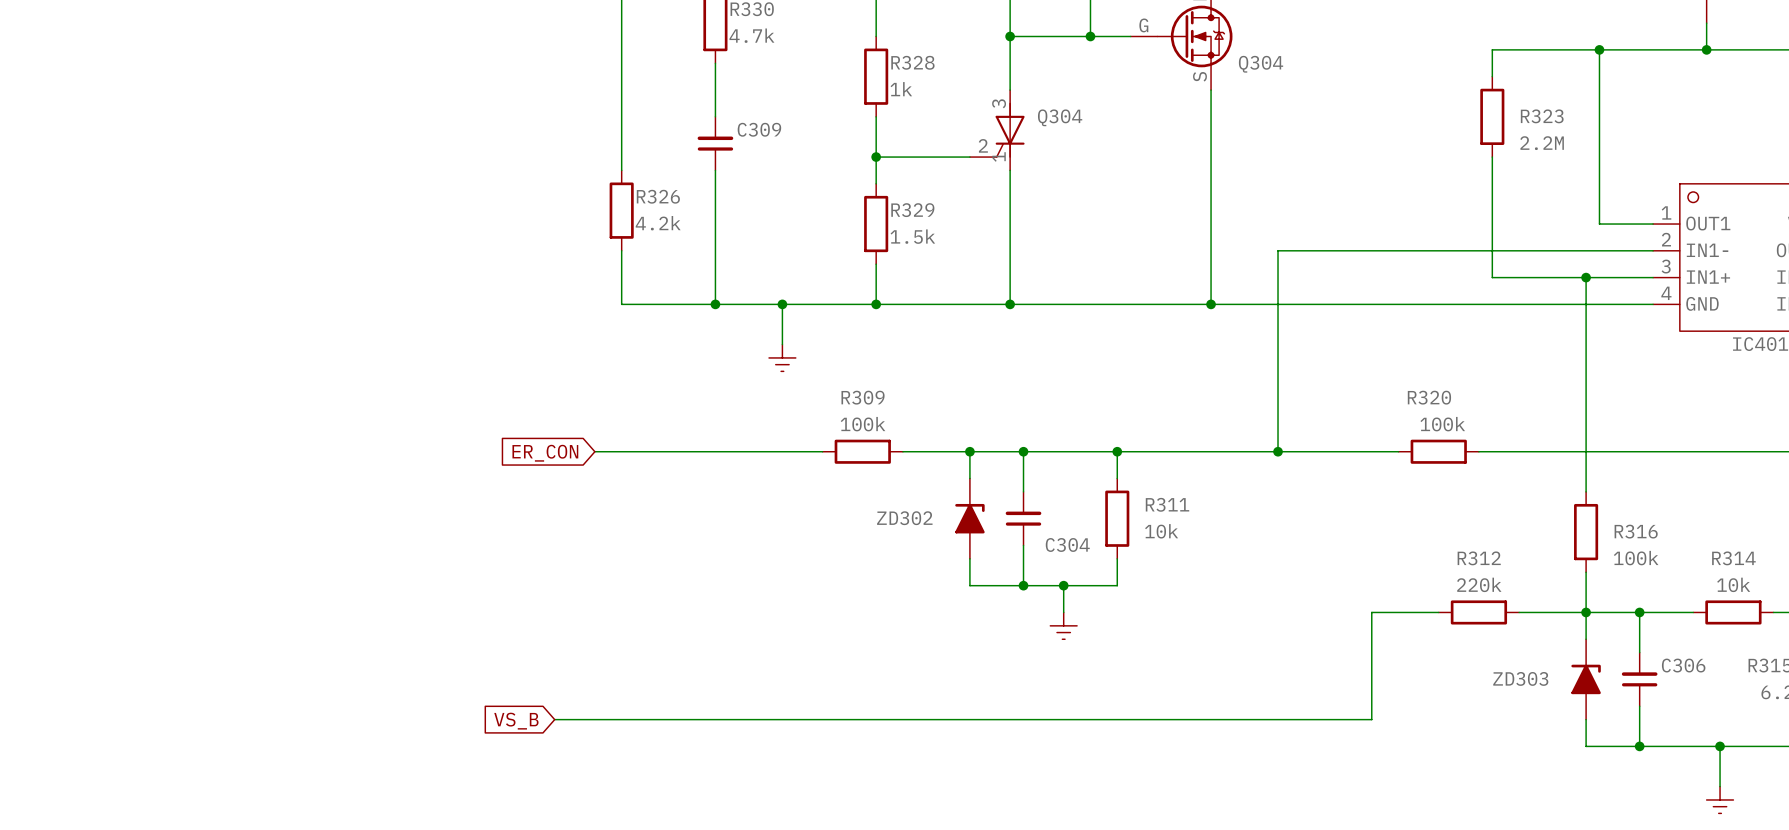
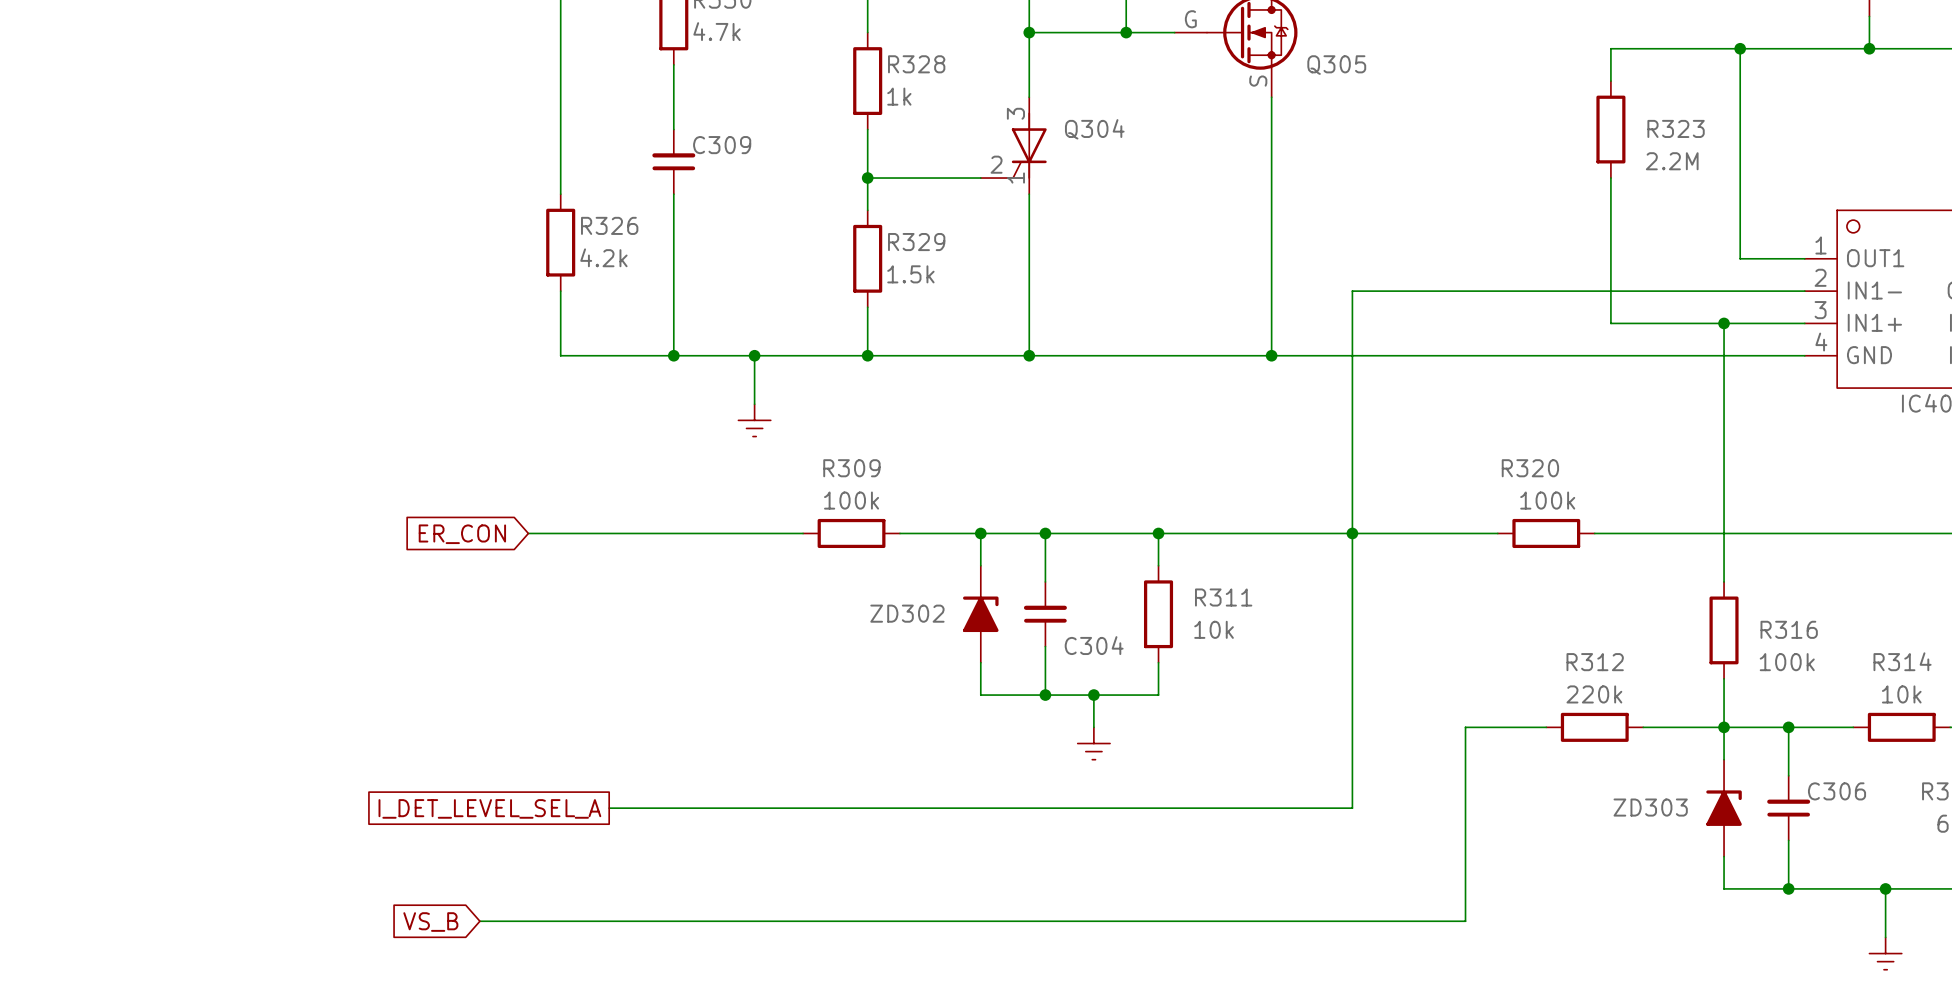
Q304 name: Q304 (1261, 64) -> Q305 (1336, 65)
wire: none -> (1352, 533) (1352, 808) (609, 808)
global label: none -> I_DET_LEVEL_SEL_A (489, 808)
wire: (554, 719) (1371, 719) -> (479, 921) (1465, 921) (1465, 856)
global label position: VS_B (516, 721) -> VS_B (430, 922)

